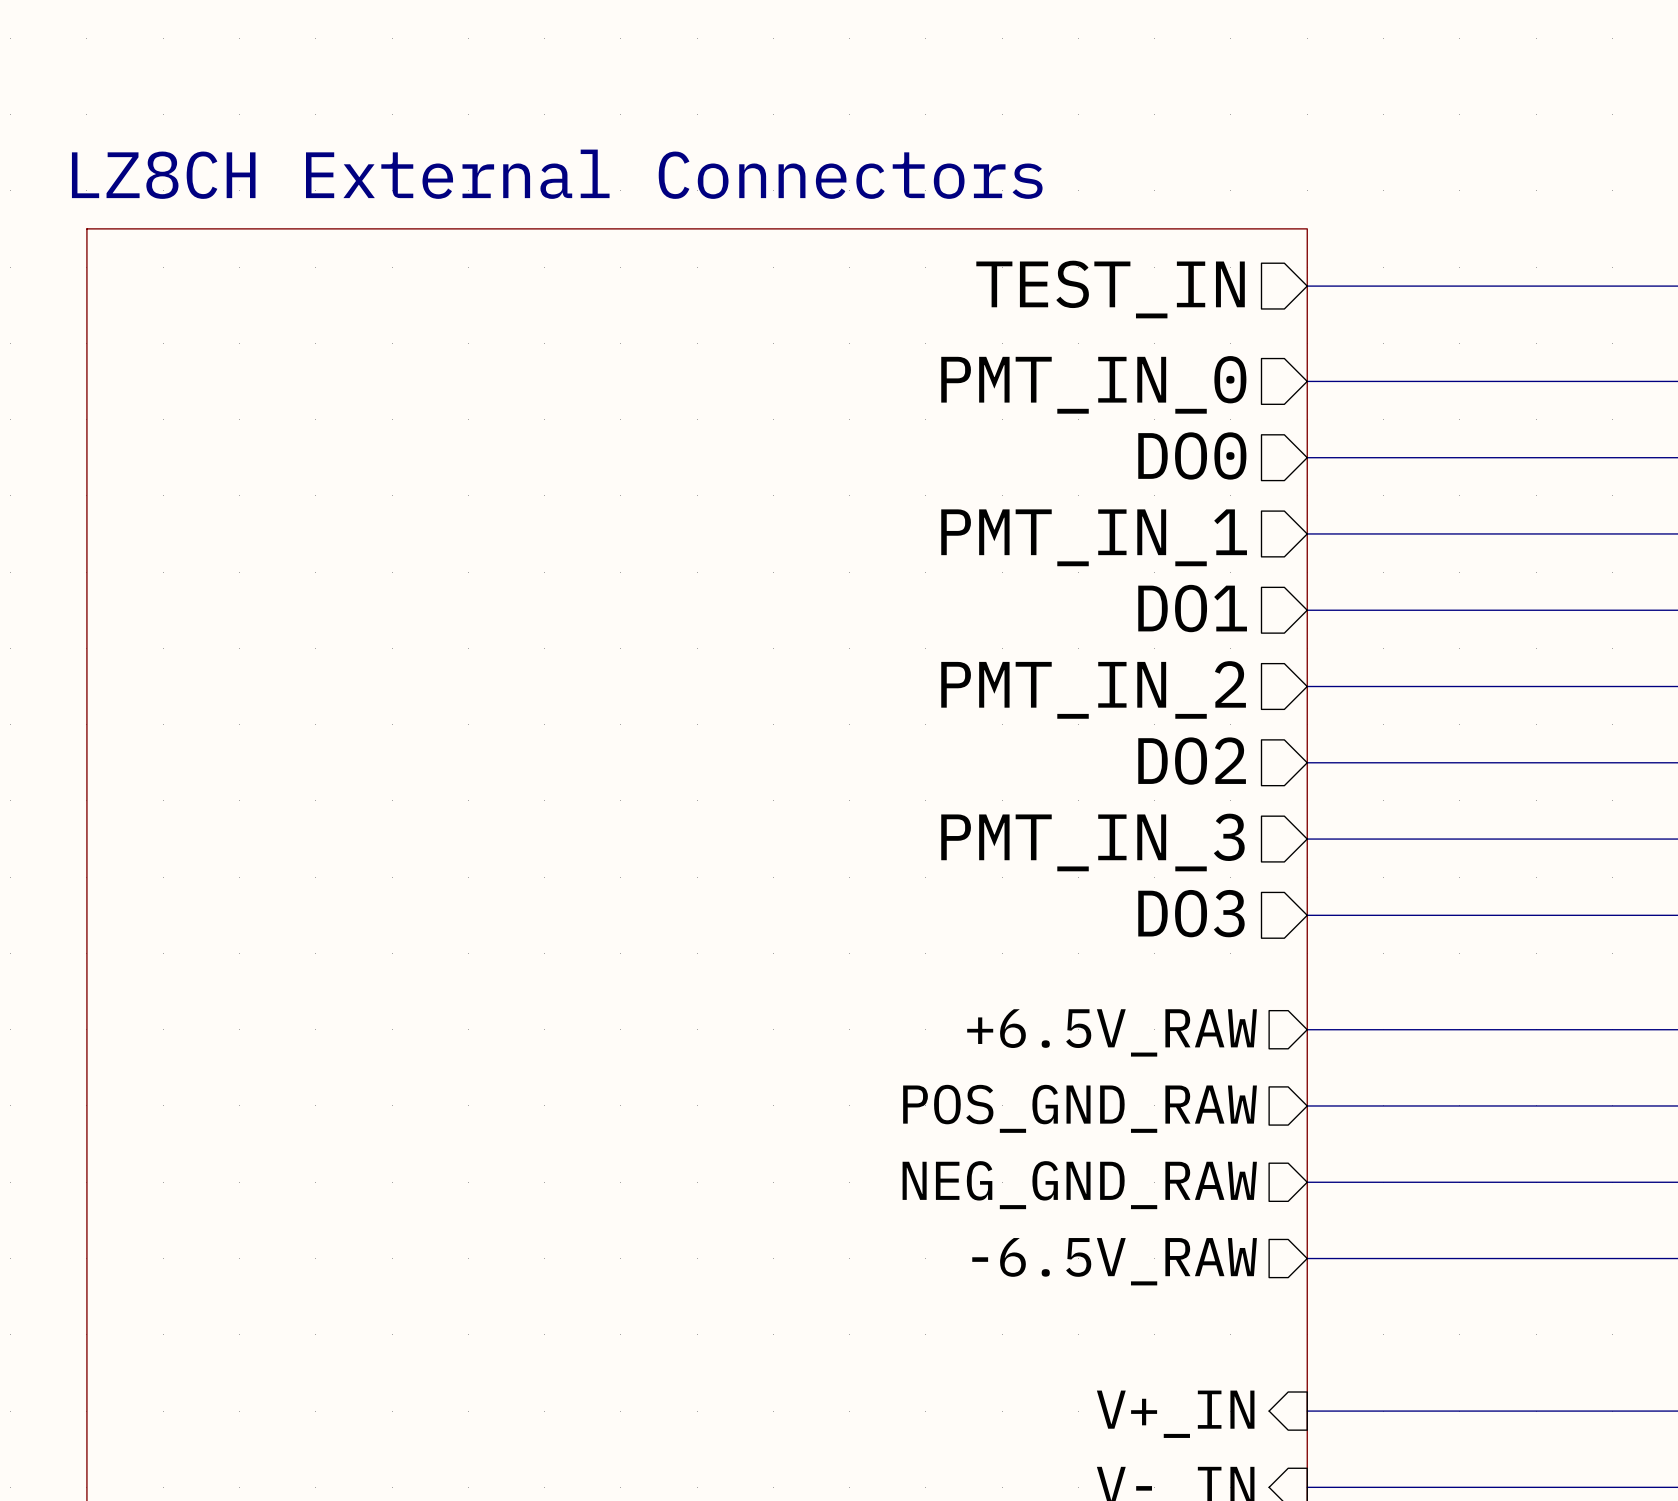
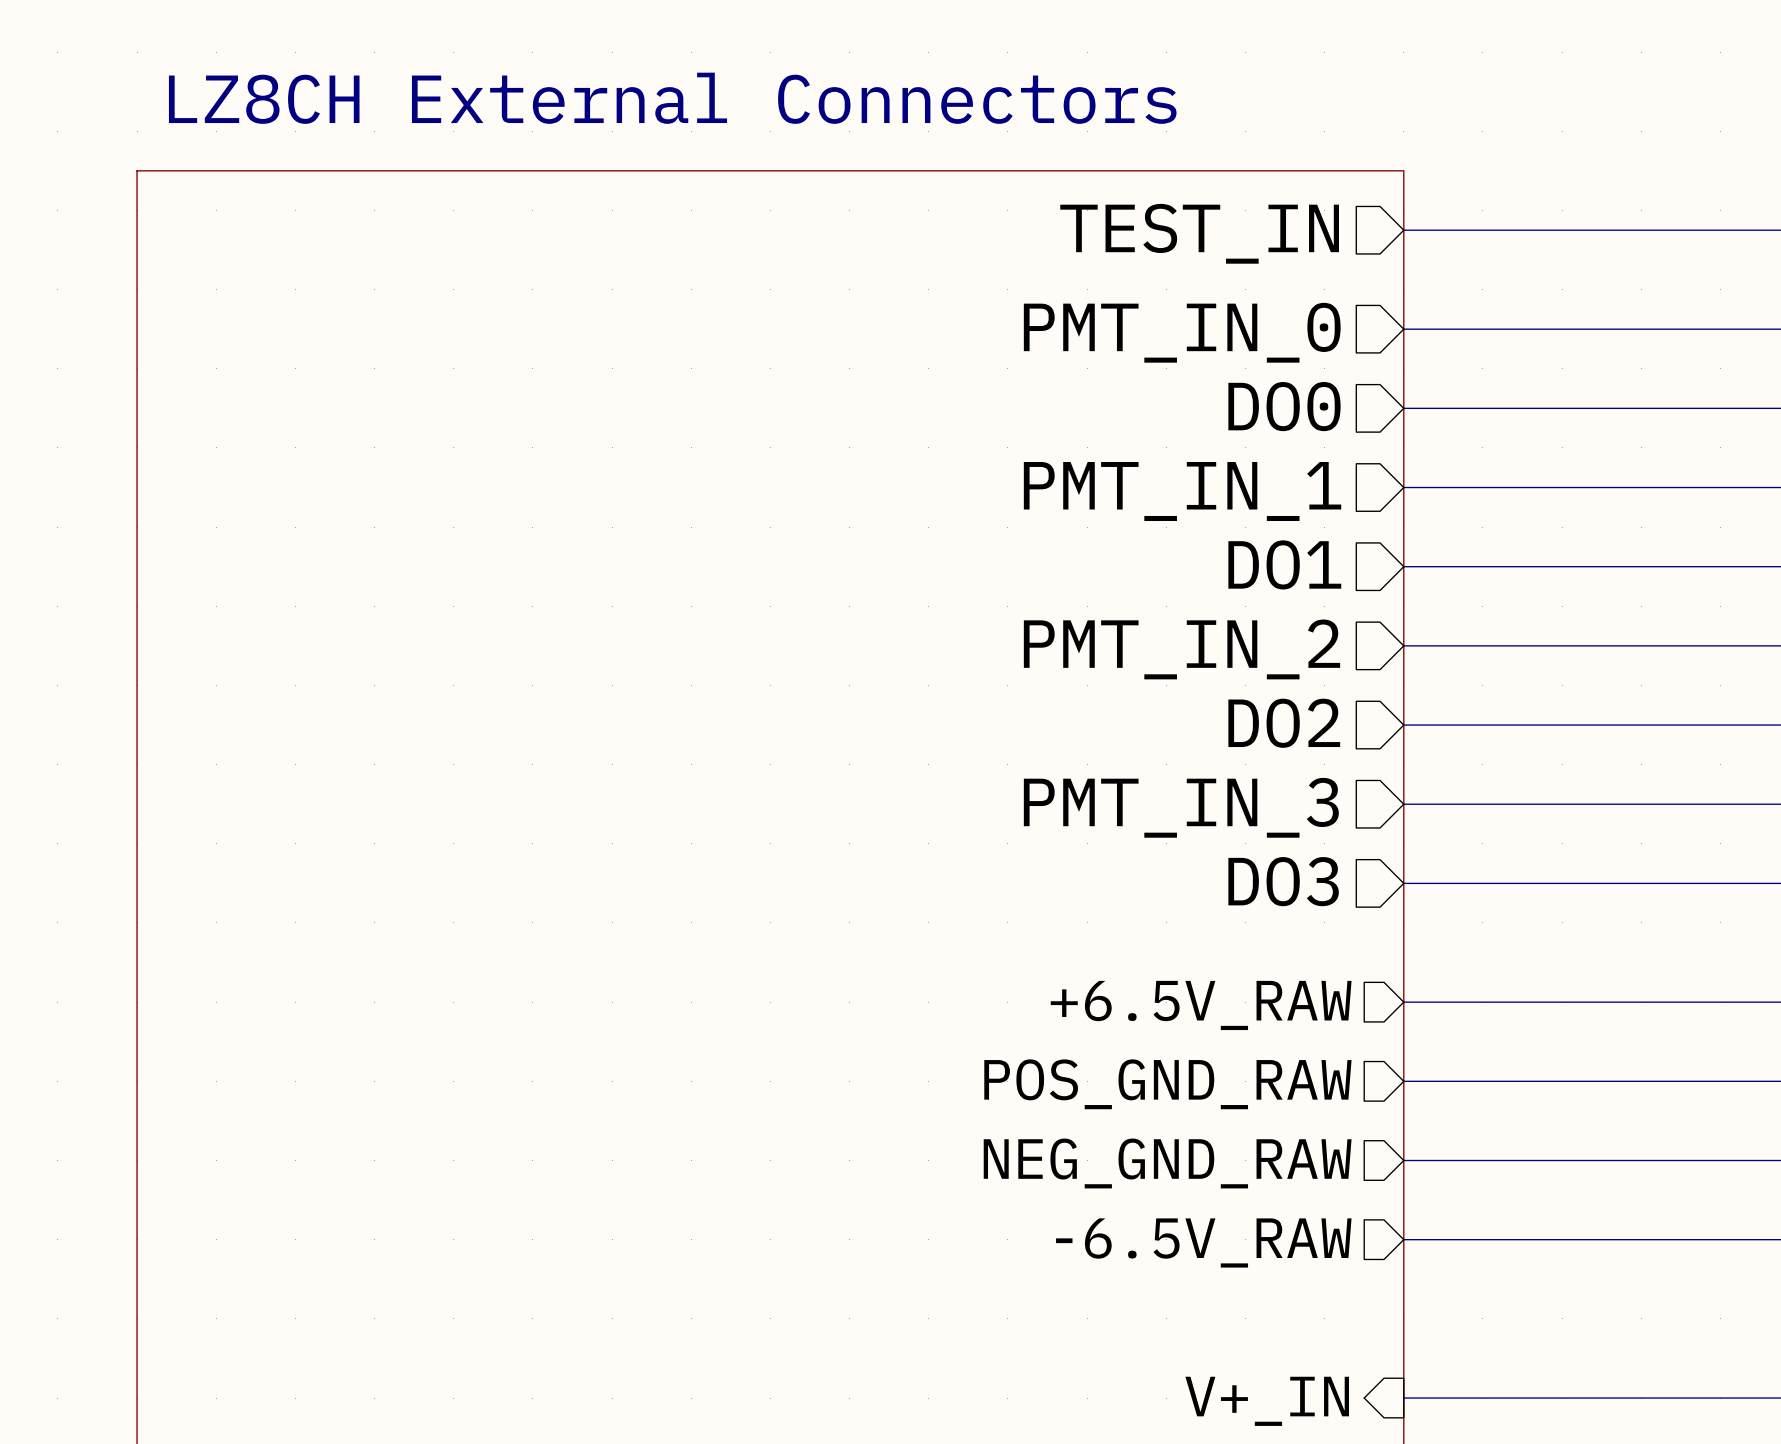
sheet LZ8CH External Connectors name position: LZ8CH External Connectors (557, 174) -> LZ8CH External Connectors (672, 98)

